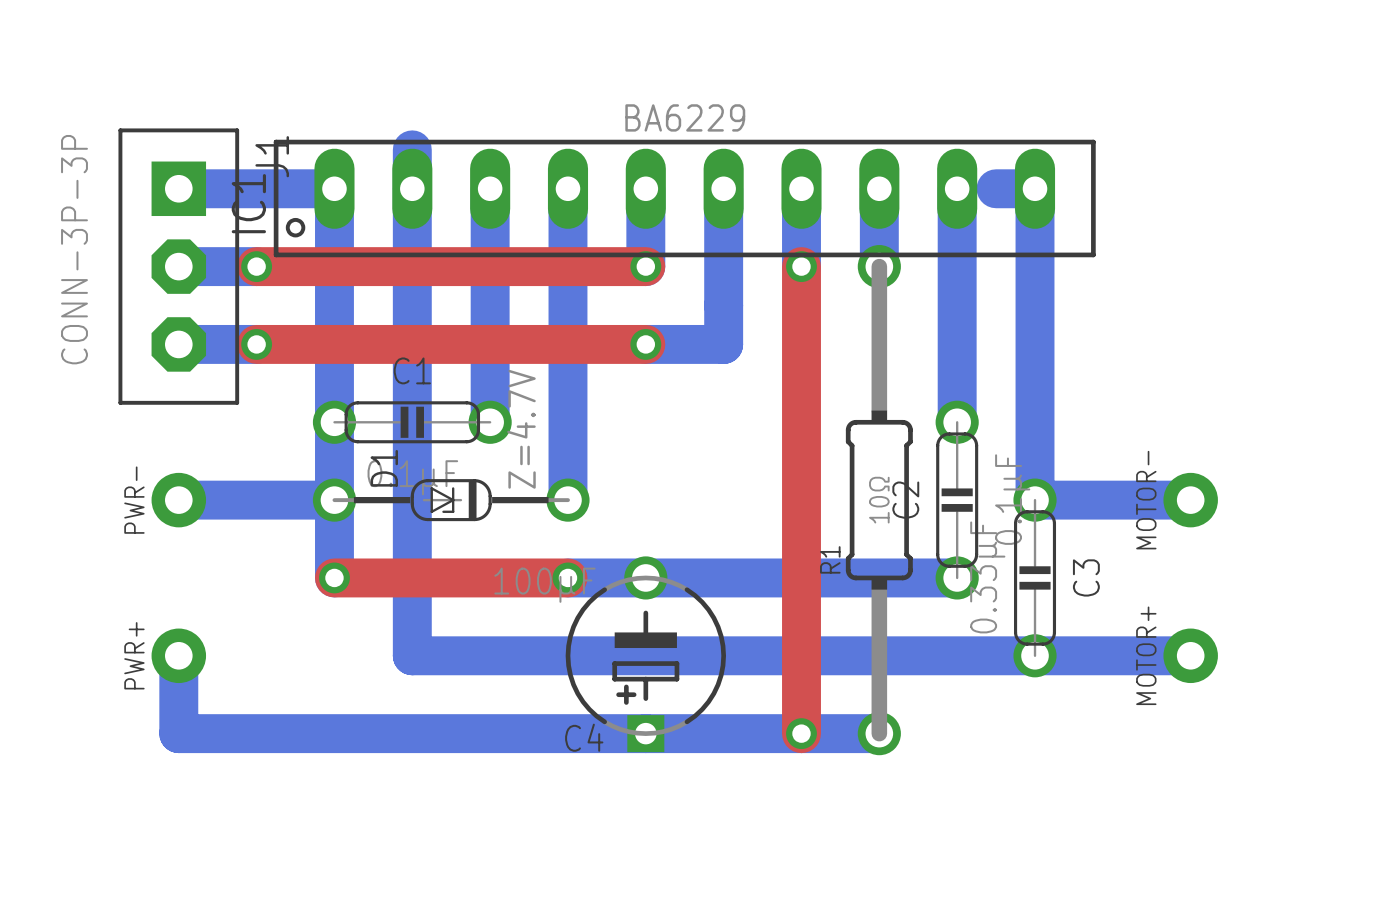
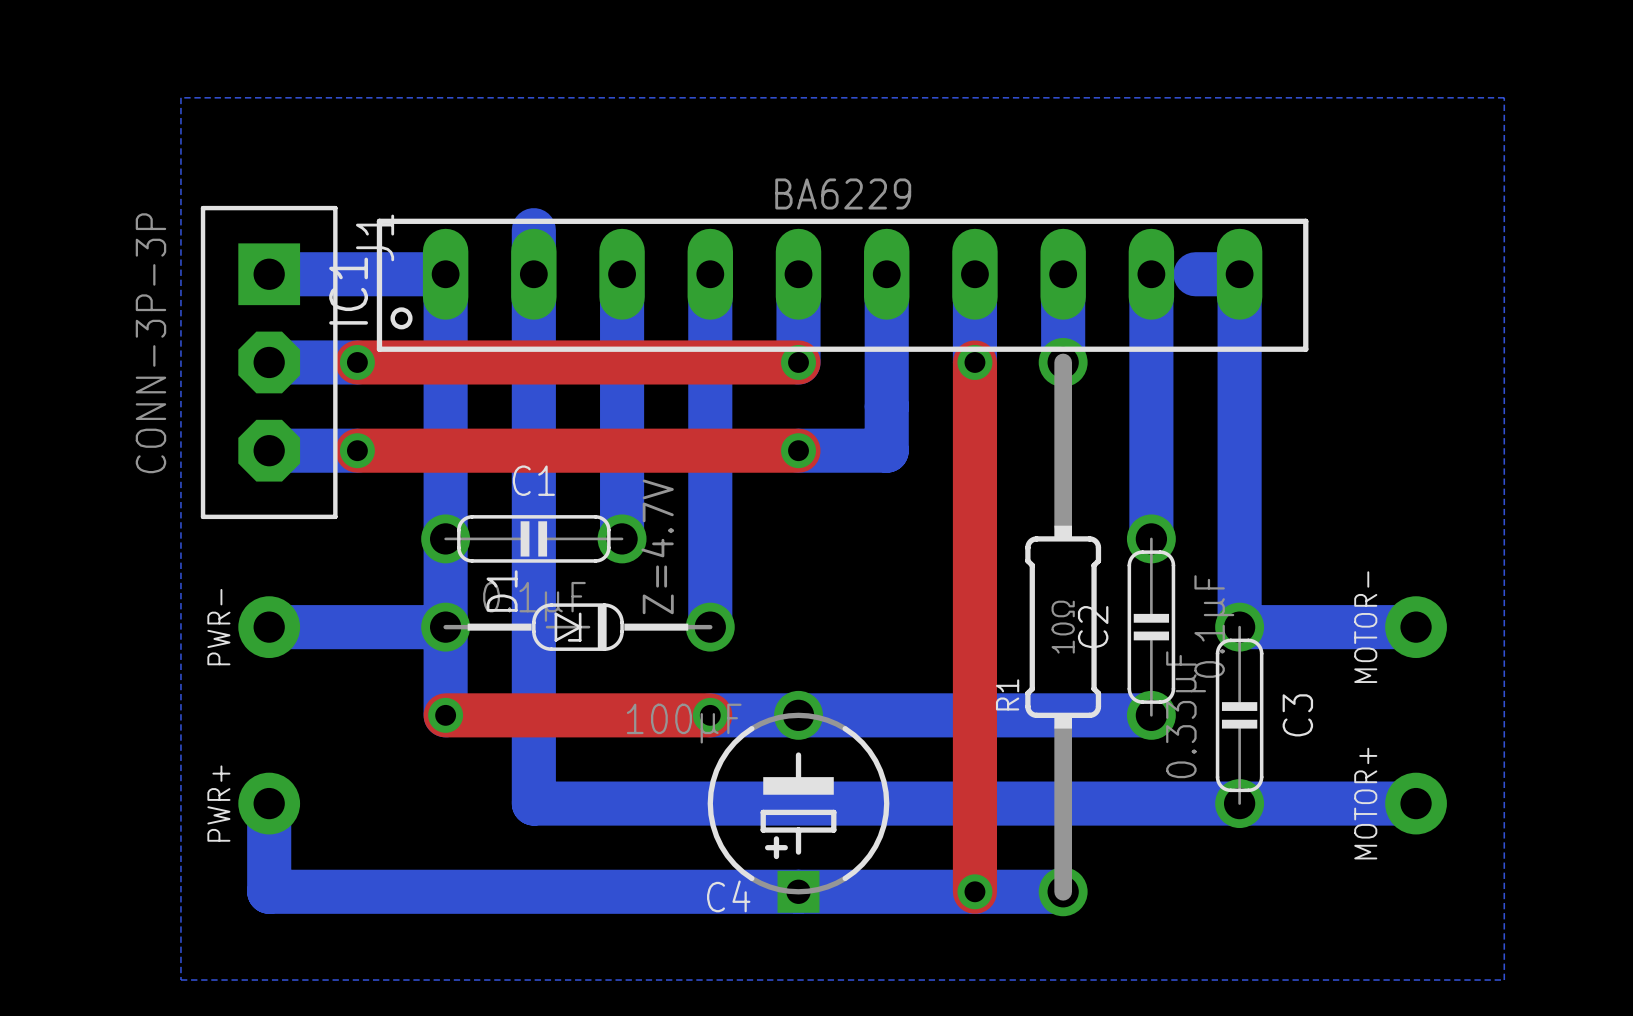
bottom zone outline: none -> (180, 97) (180, 980) (1504, 980) (1504, 97) (180, 97)

